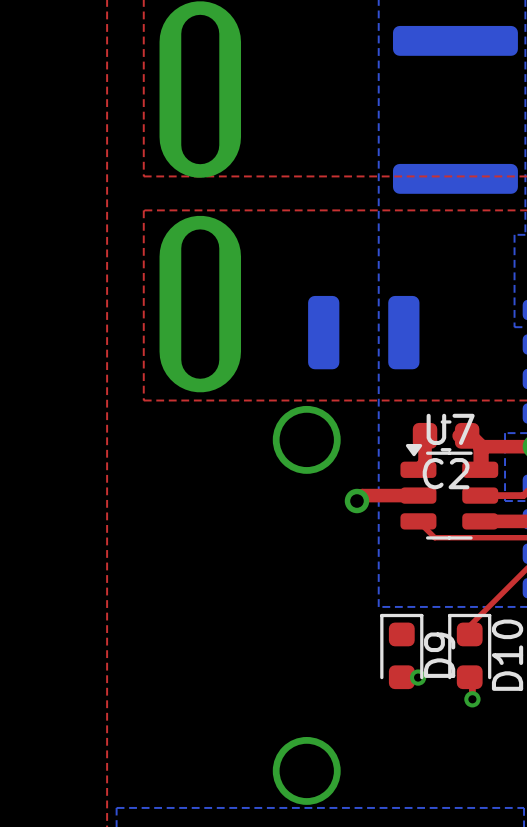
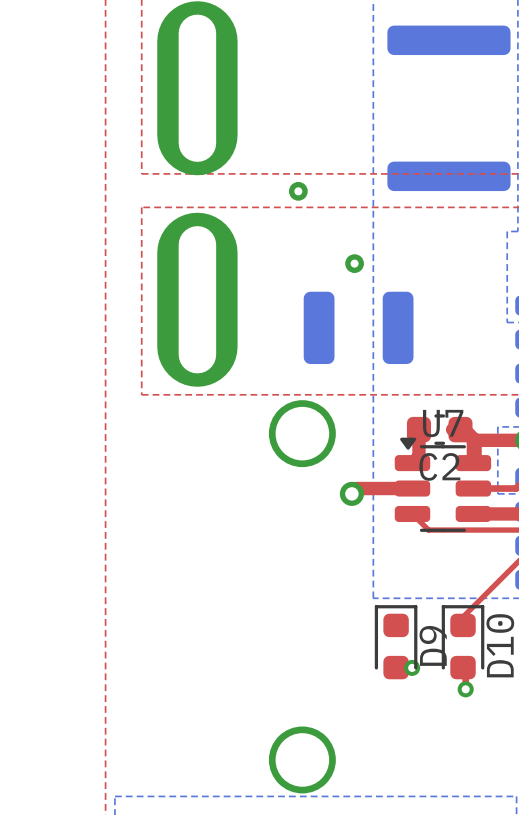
via: none -> (298, 191)
via: none -> (354, 263)

